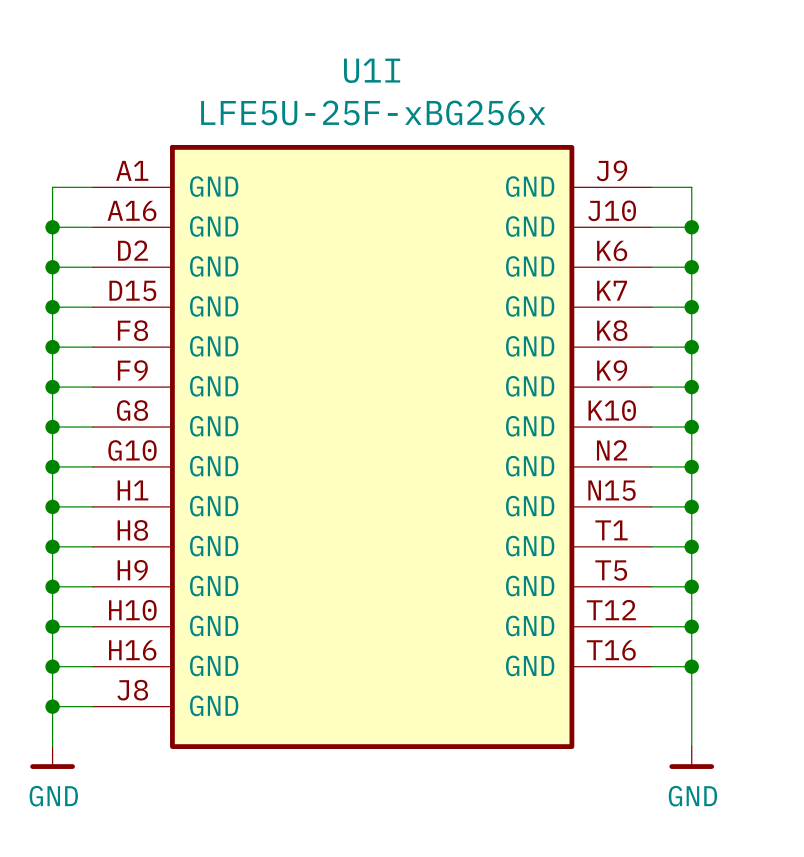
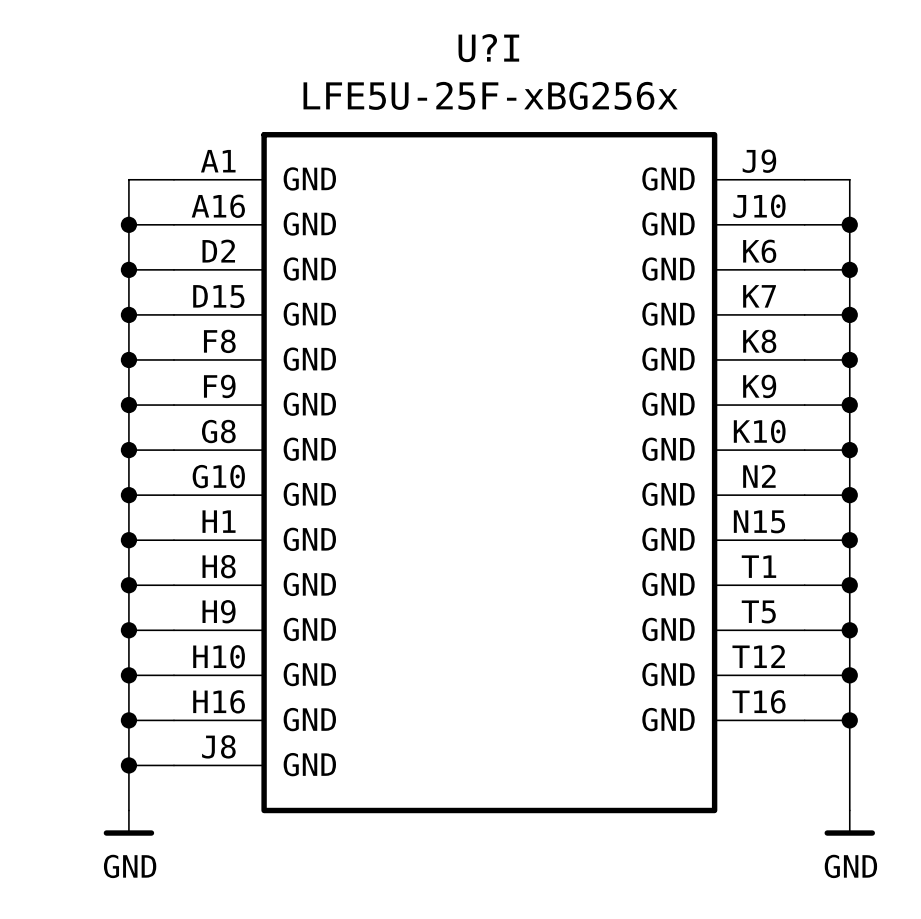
U1I name: U1I (372, 70) -> U?I (488, 48)

